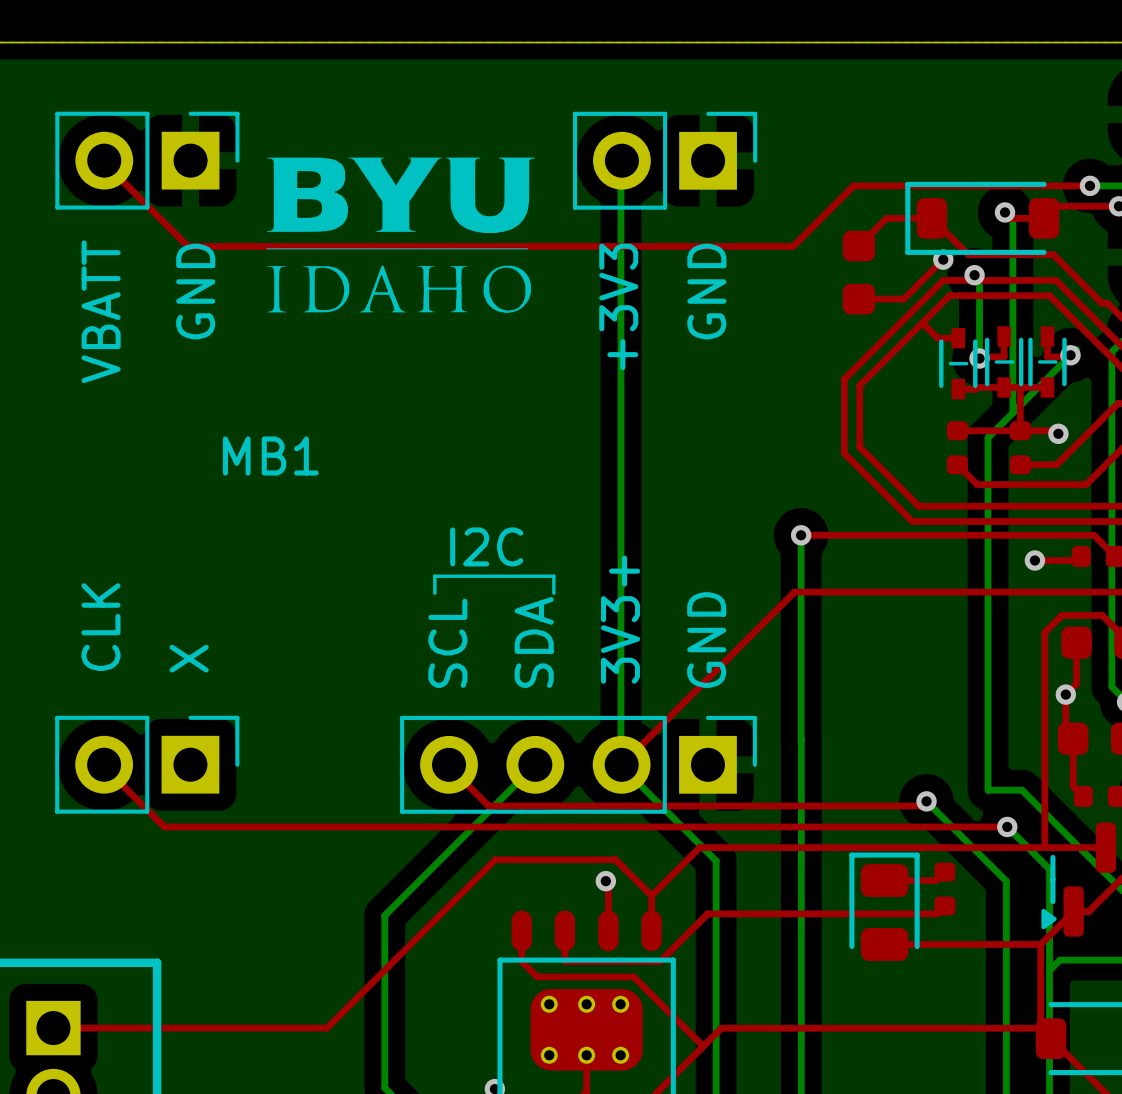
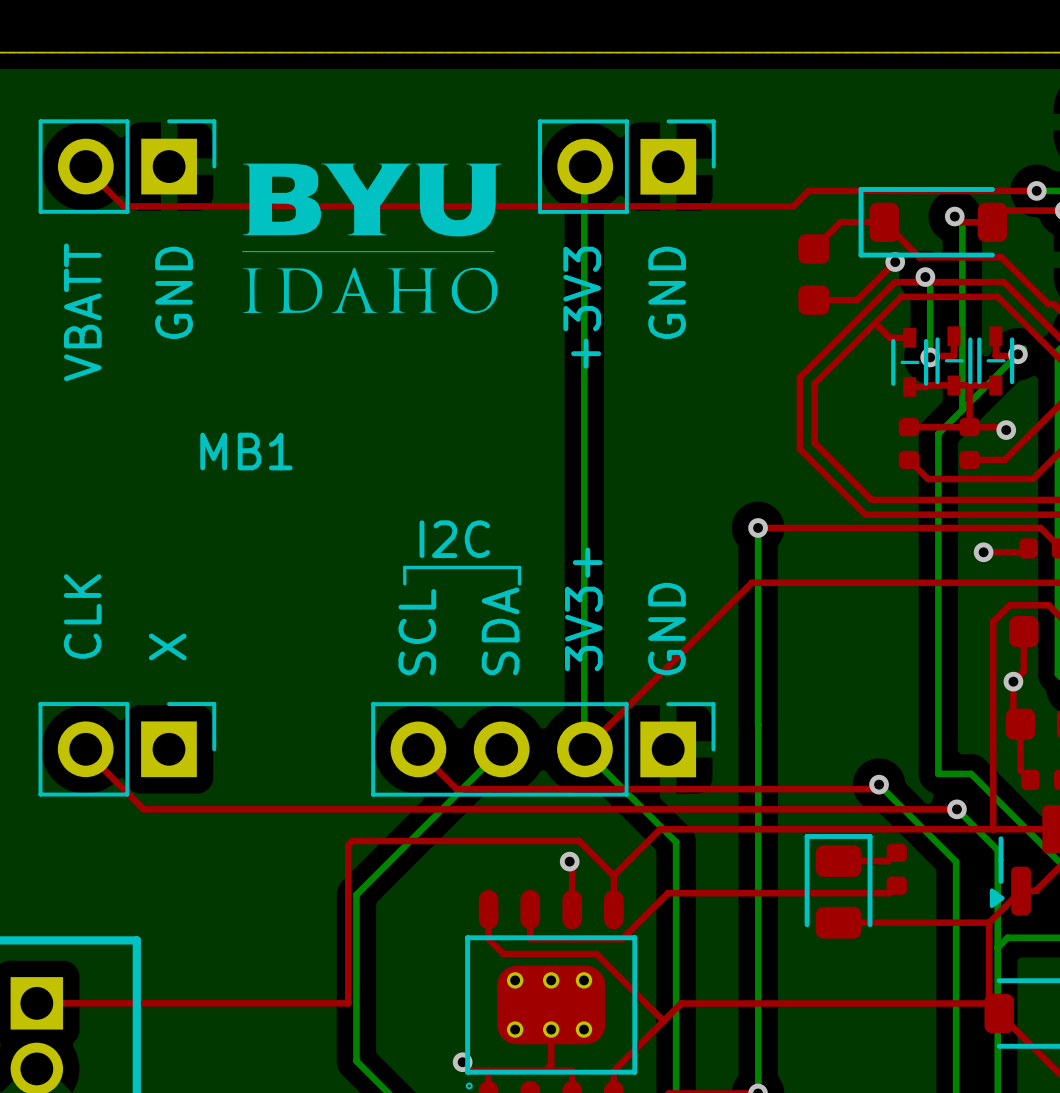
top track: (853, 185) (793, 246) (188, 246) (143, 201) -> (808, 190) (793, 206) (123, 206)
top track: (495, 859) (326, 1028) -> (463, 841) (352, 841) (348, 845) (348, 1003) (300, 1003)

